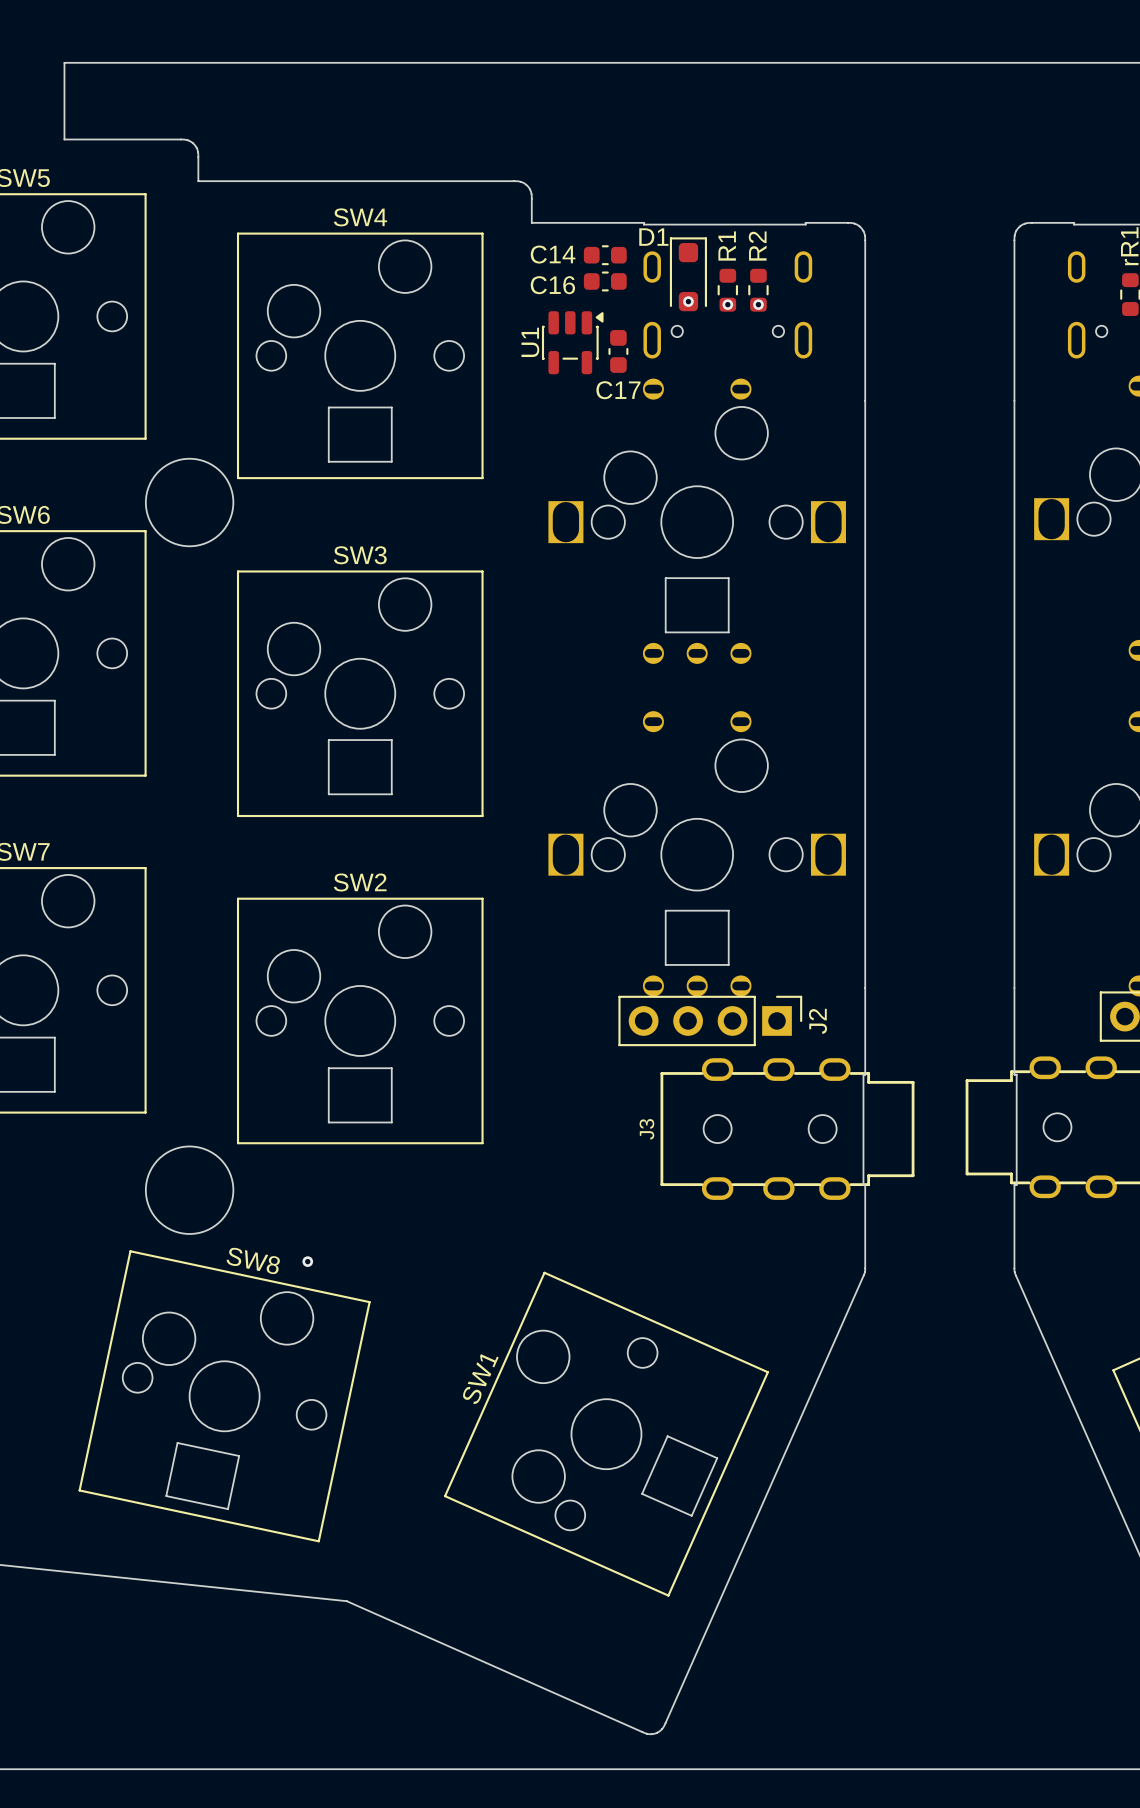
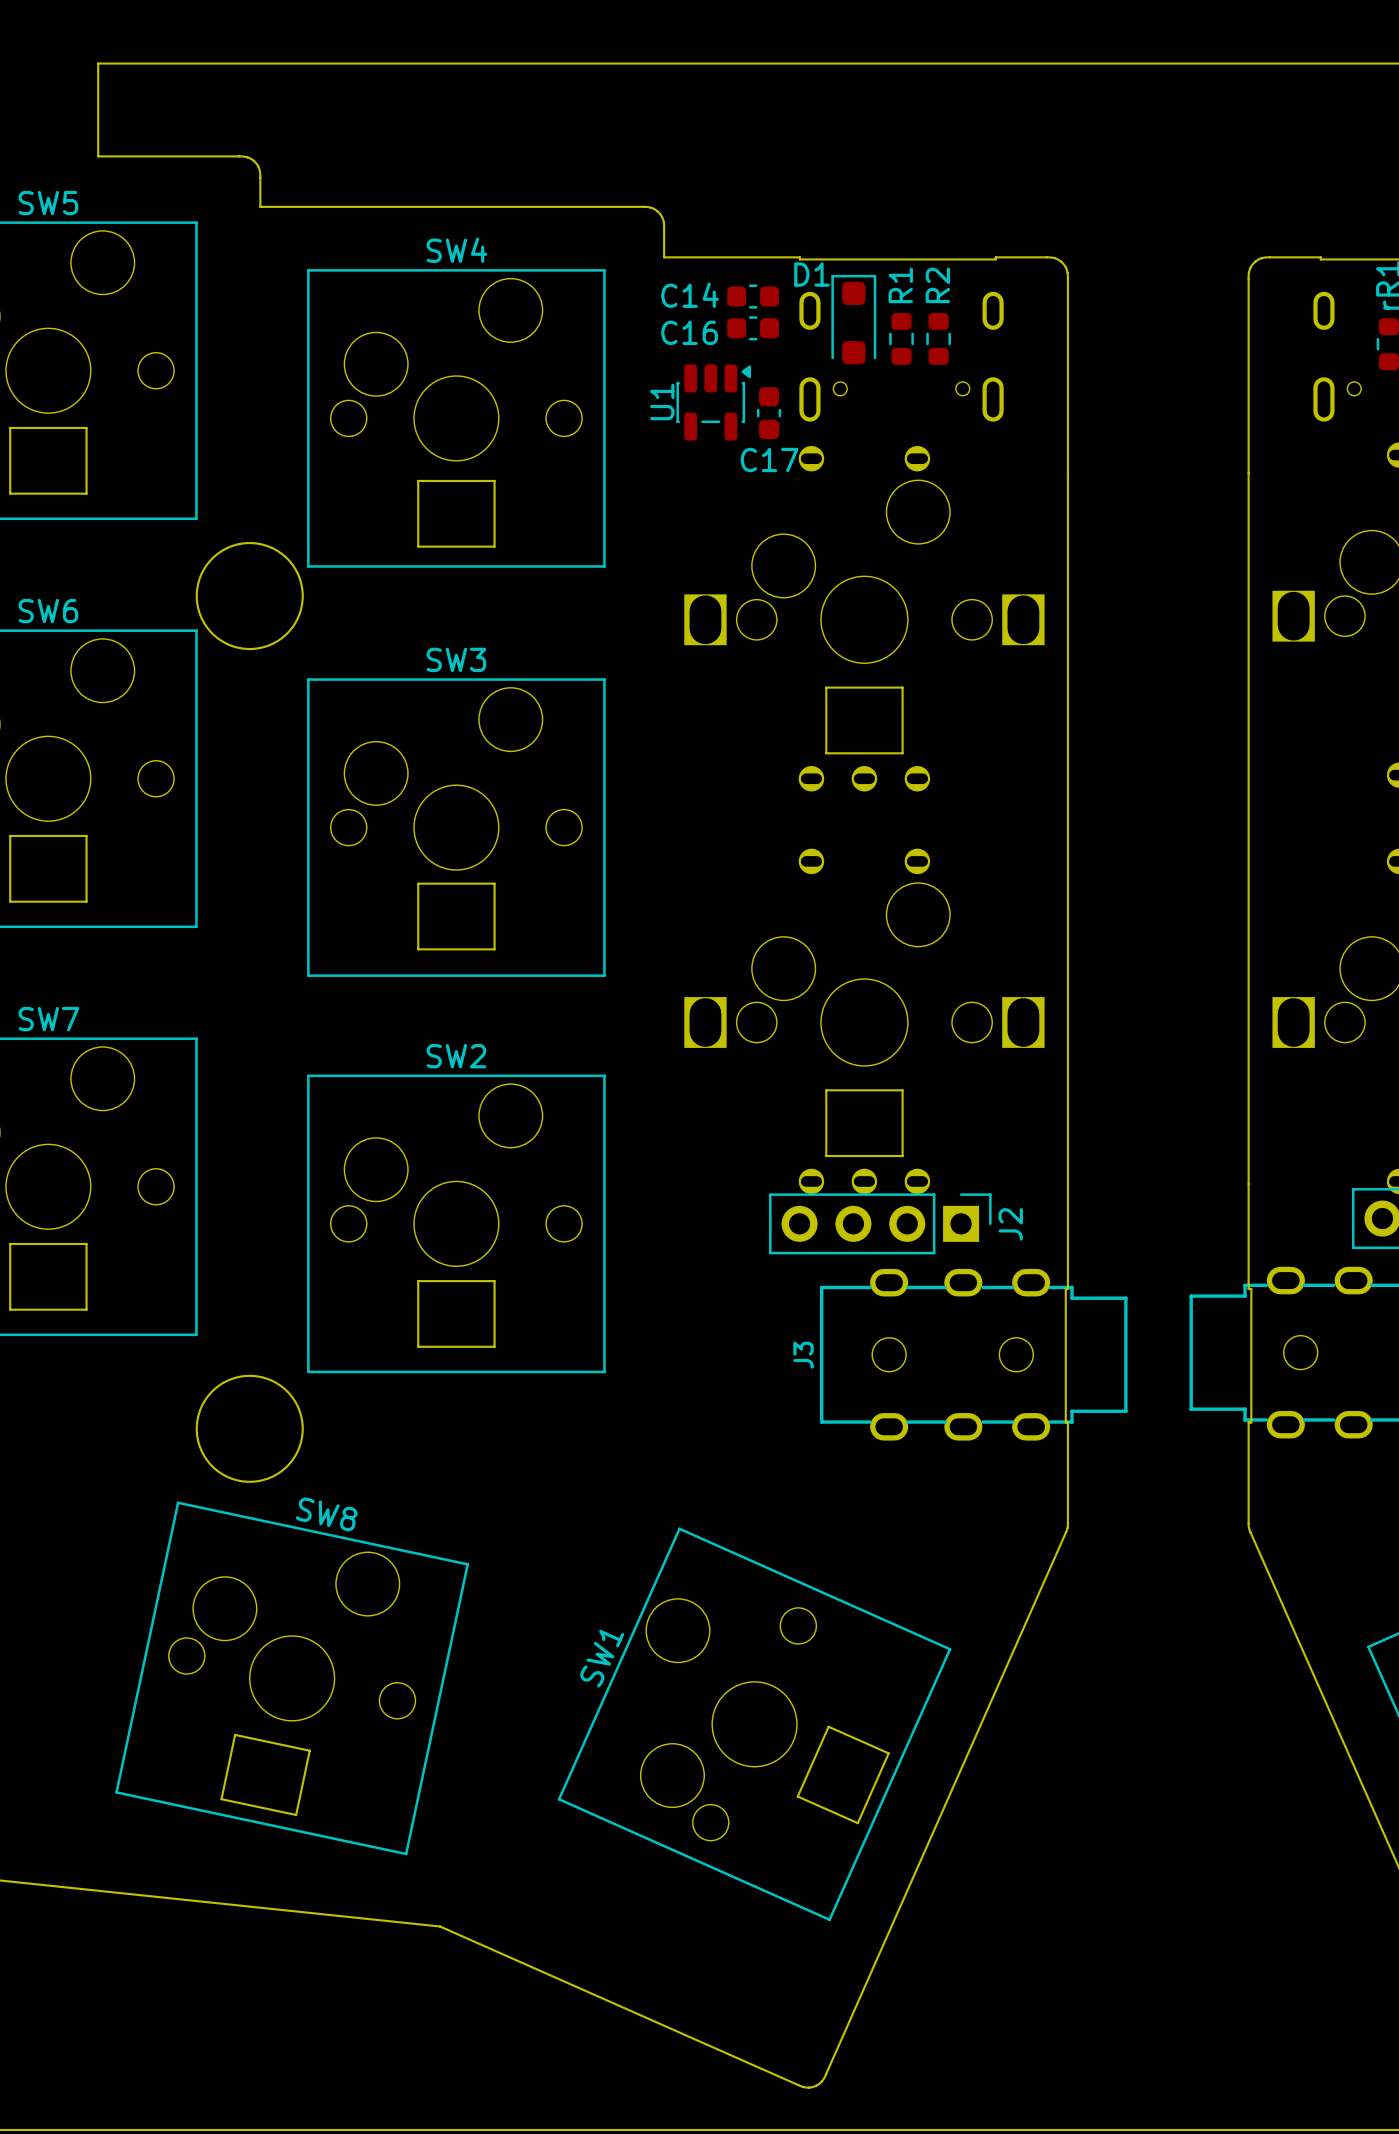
via: (688, 301) -> none
via: (727, 304) -> none
via: (758, 304) -> none
via: (307, 1261) -> none

